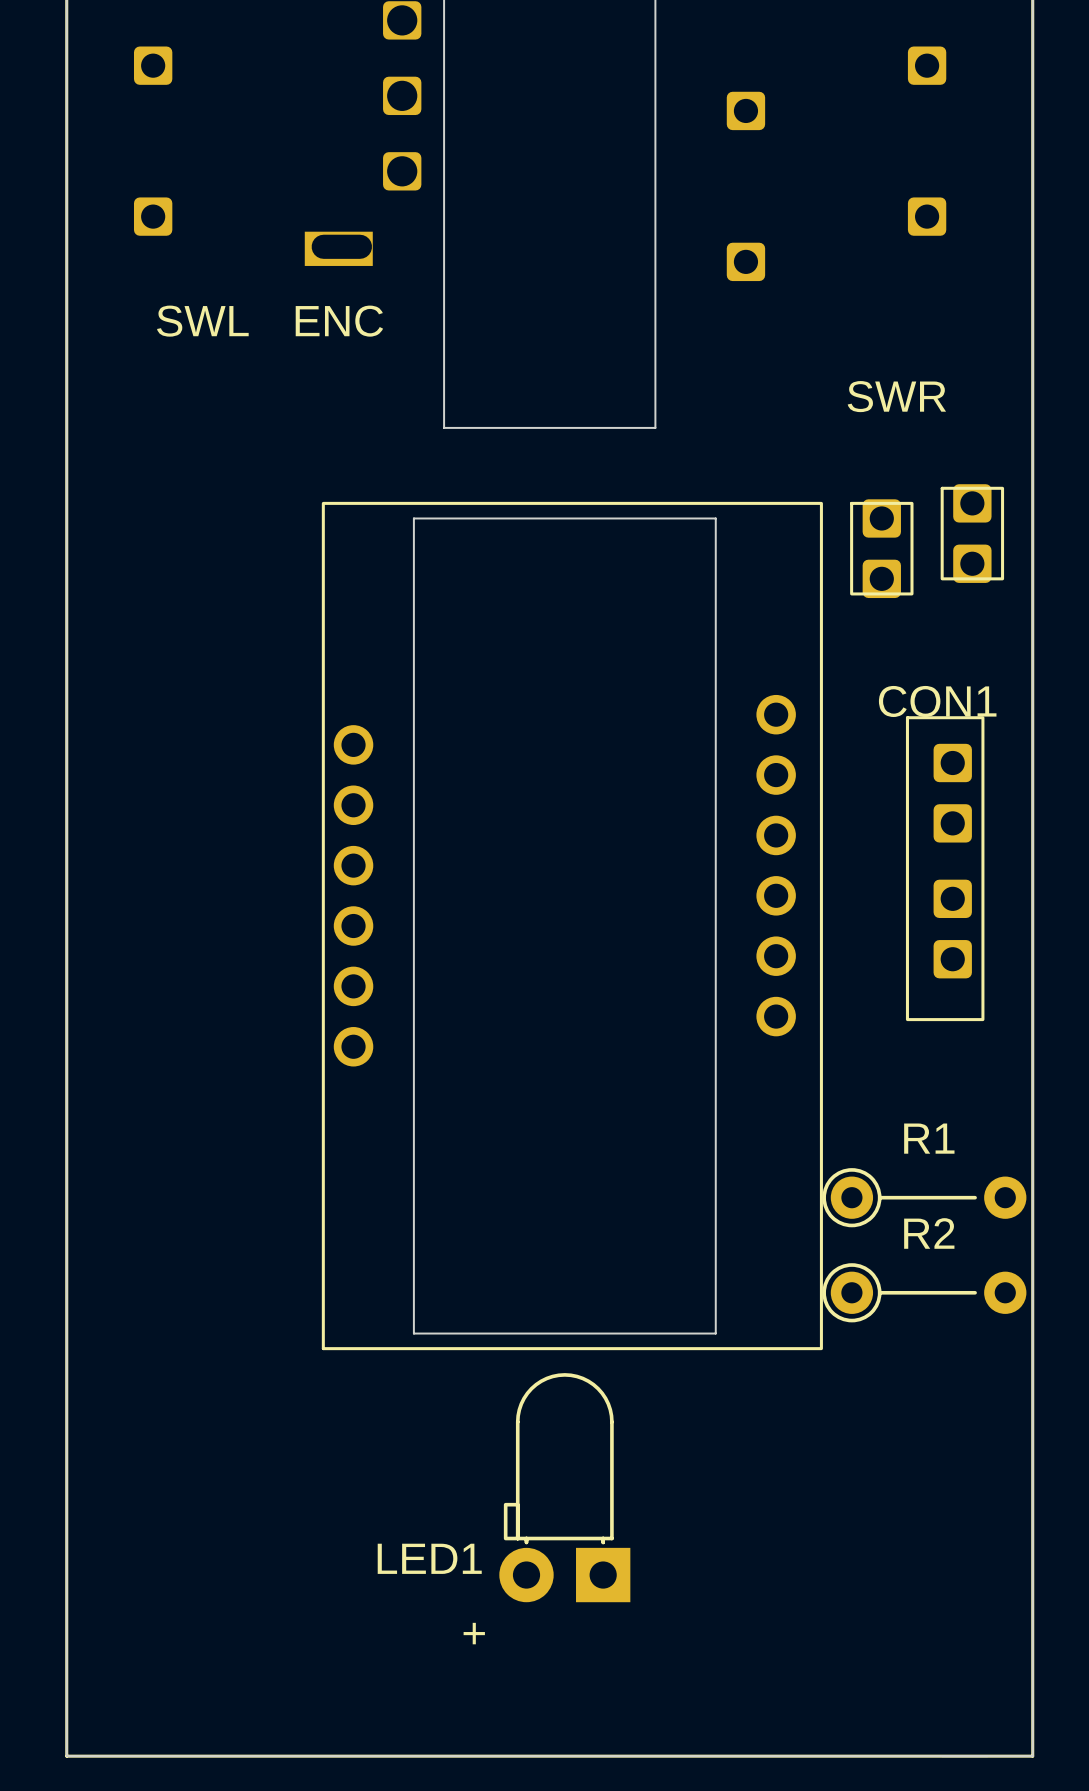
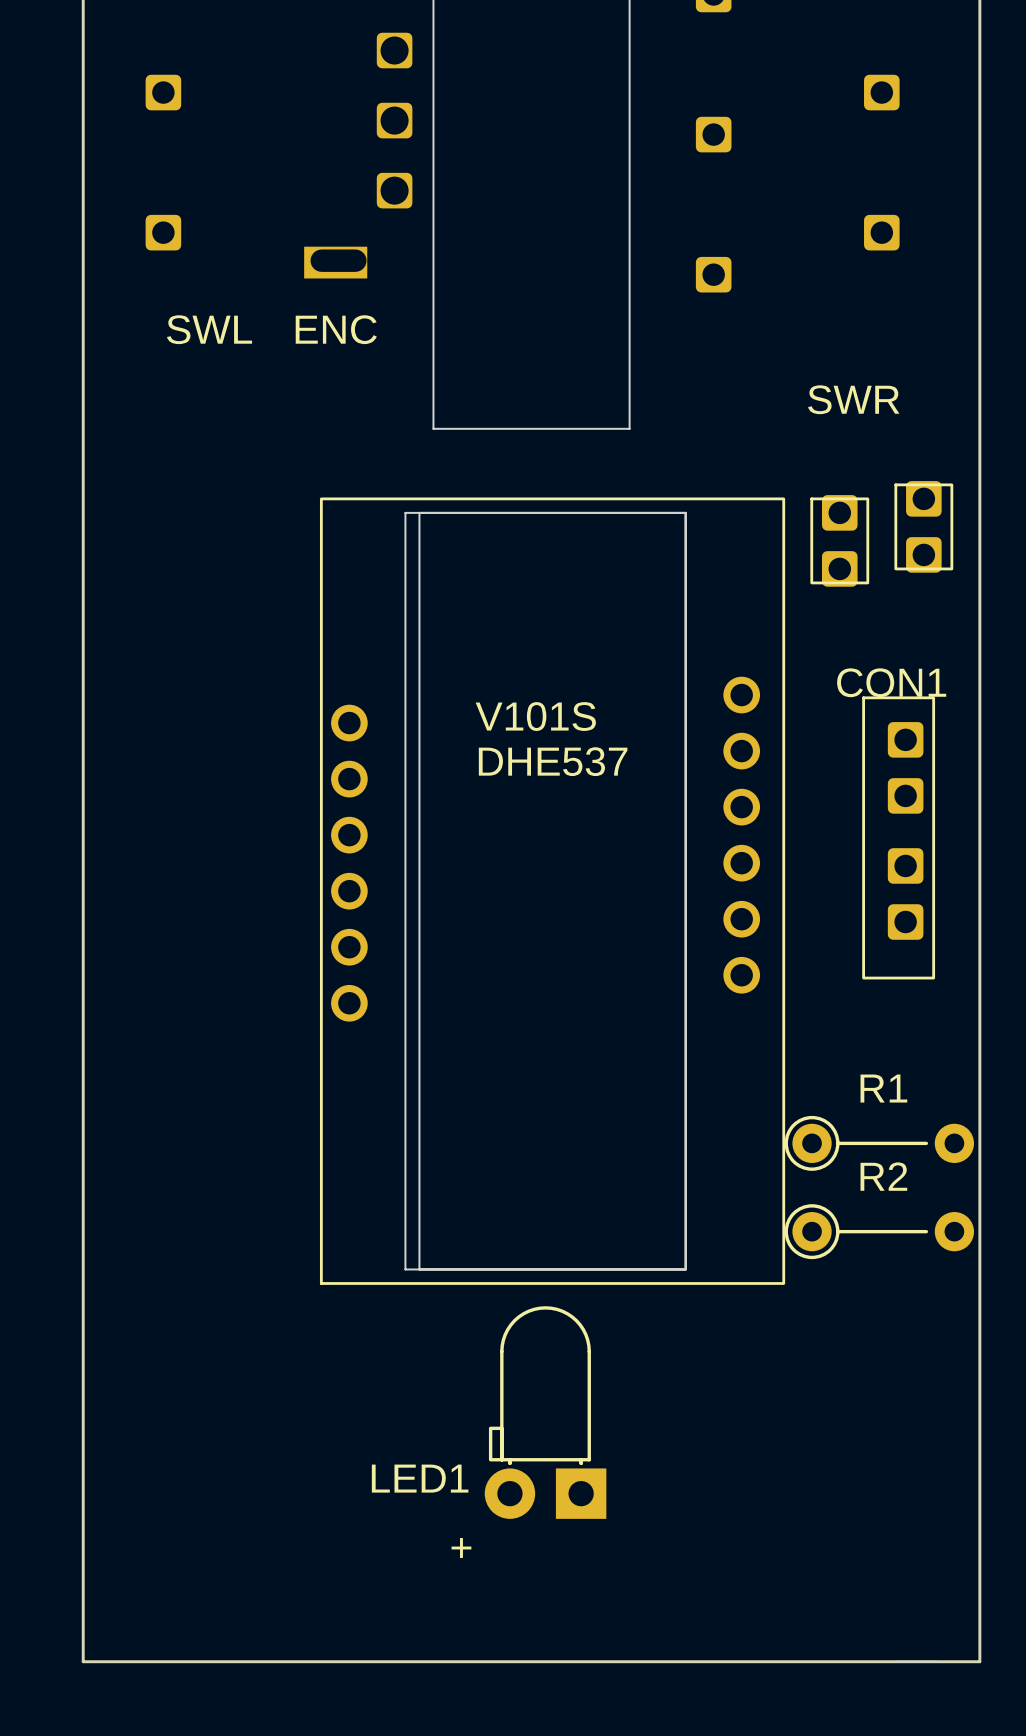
board edge: none -> (419, 512) (685, 512) (685, 1269) (419, 1269) (419, 512)
text: none -> V101S (535, 716)
text: none -> DHE537 (553, 761)

